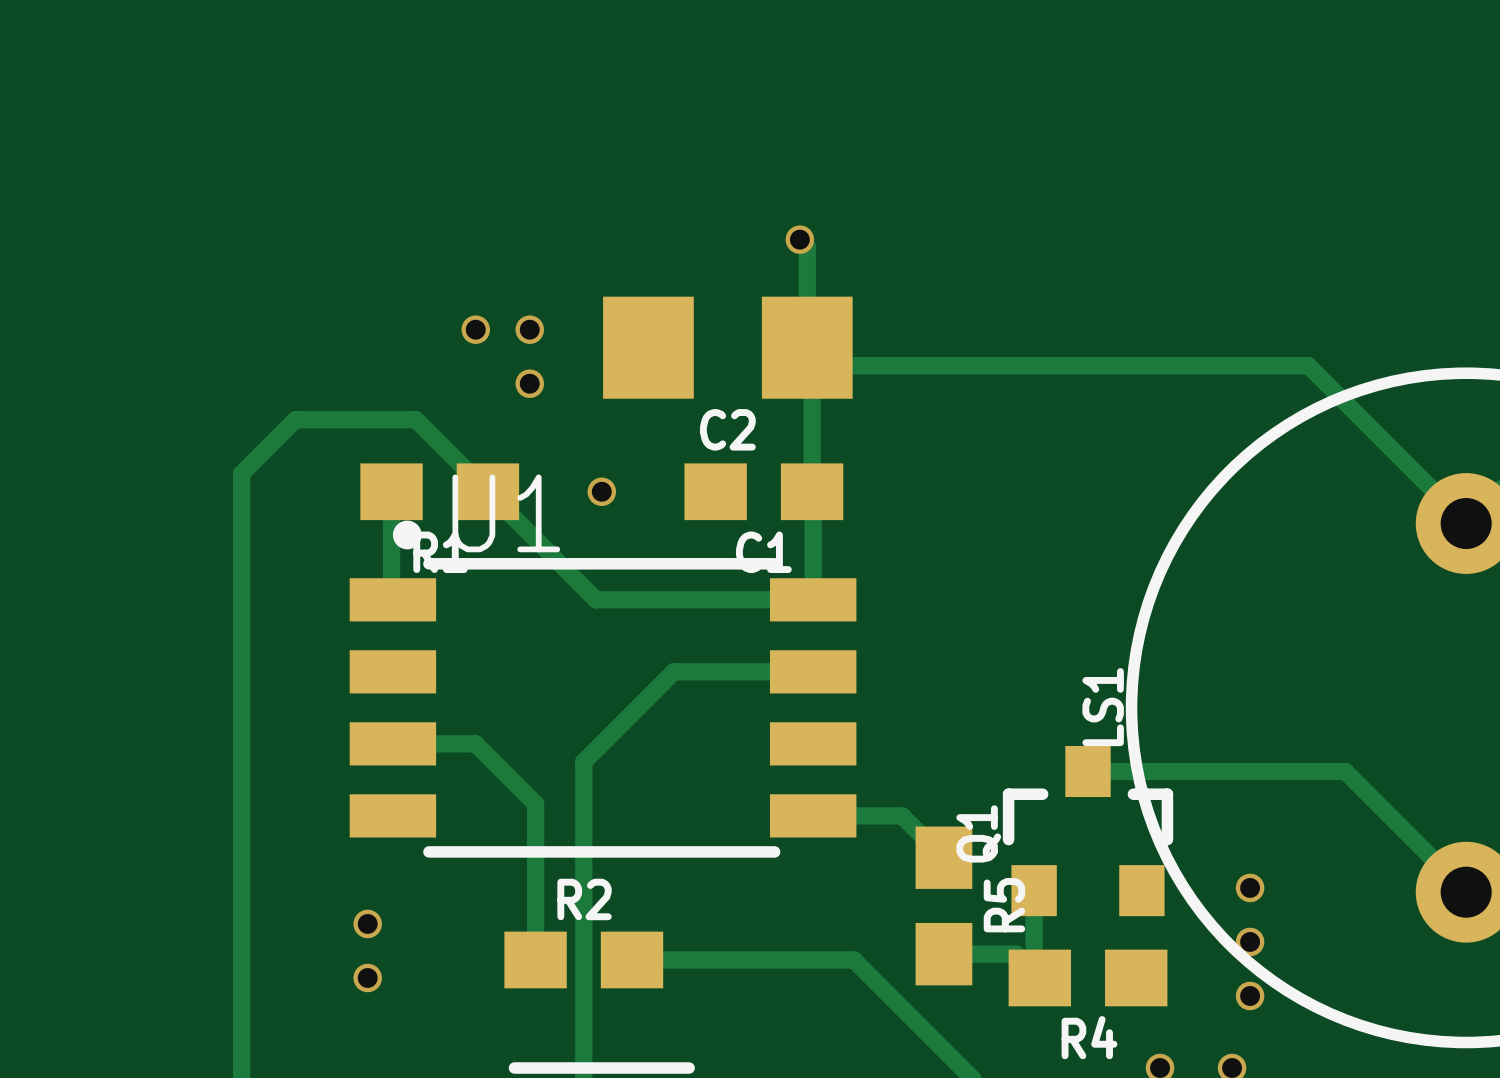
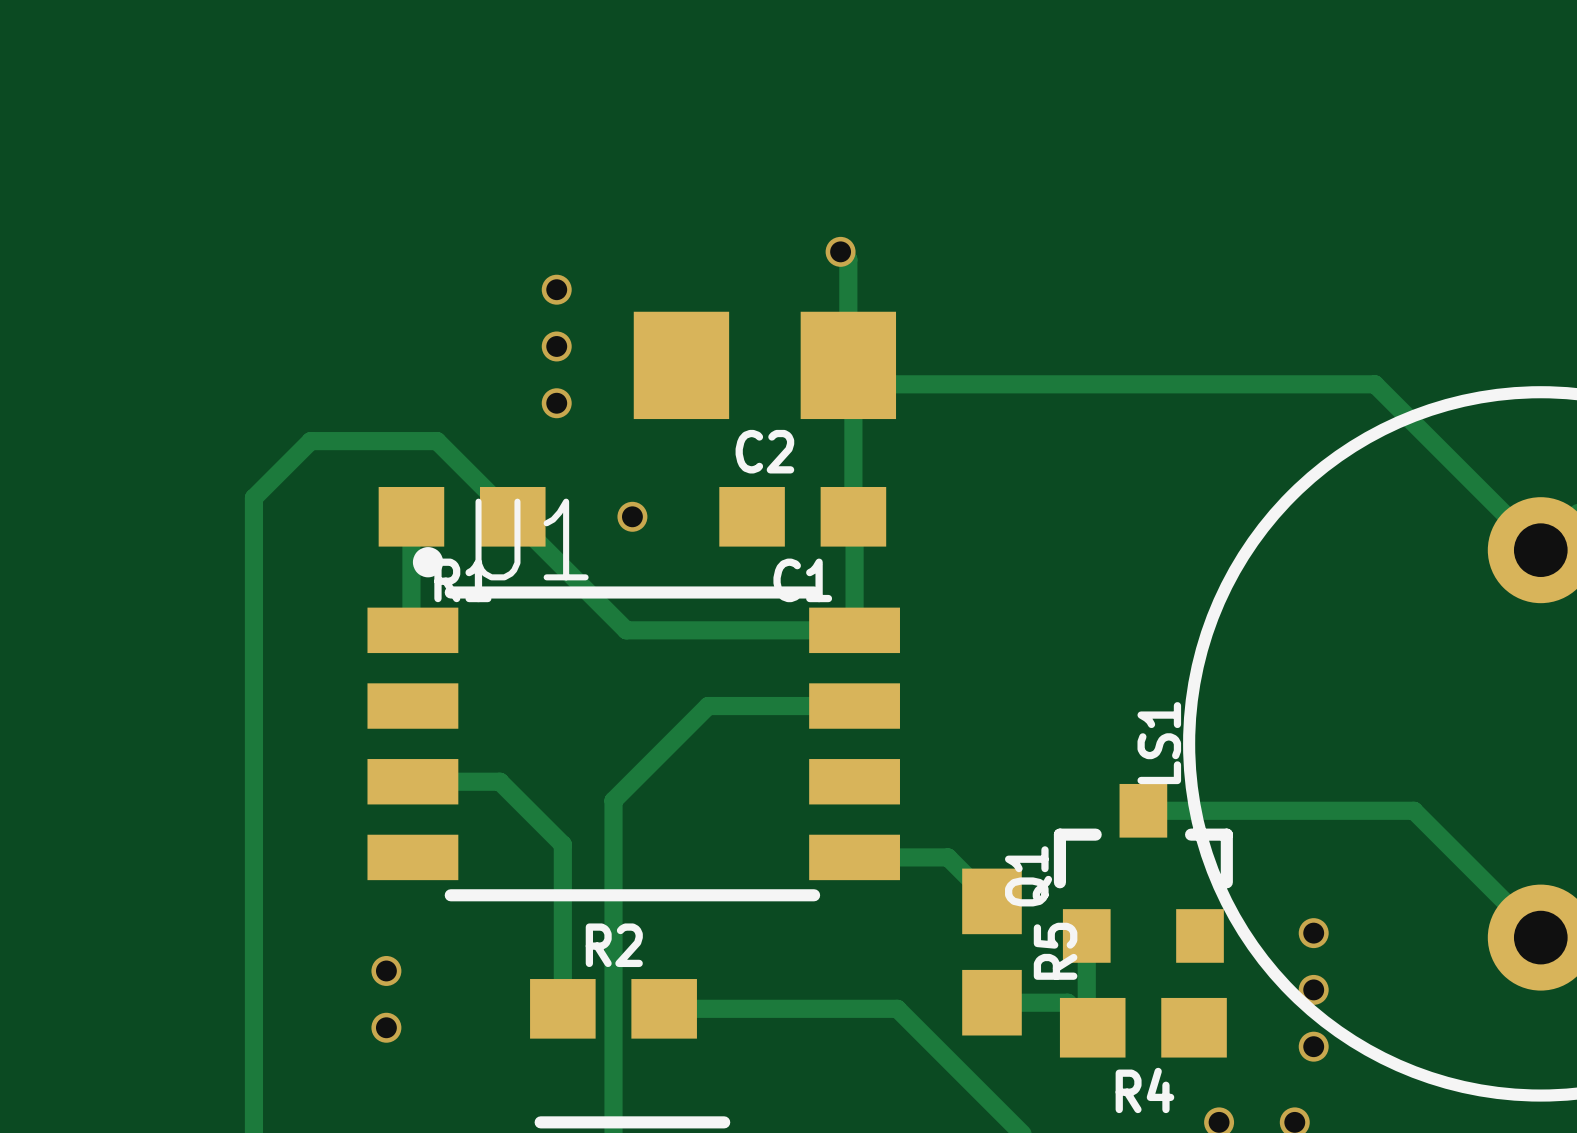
via position: (475, 329) -> (556, 289)

